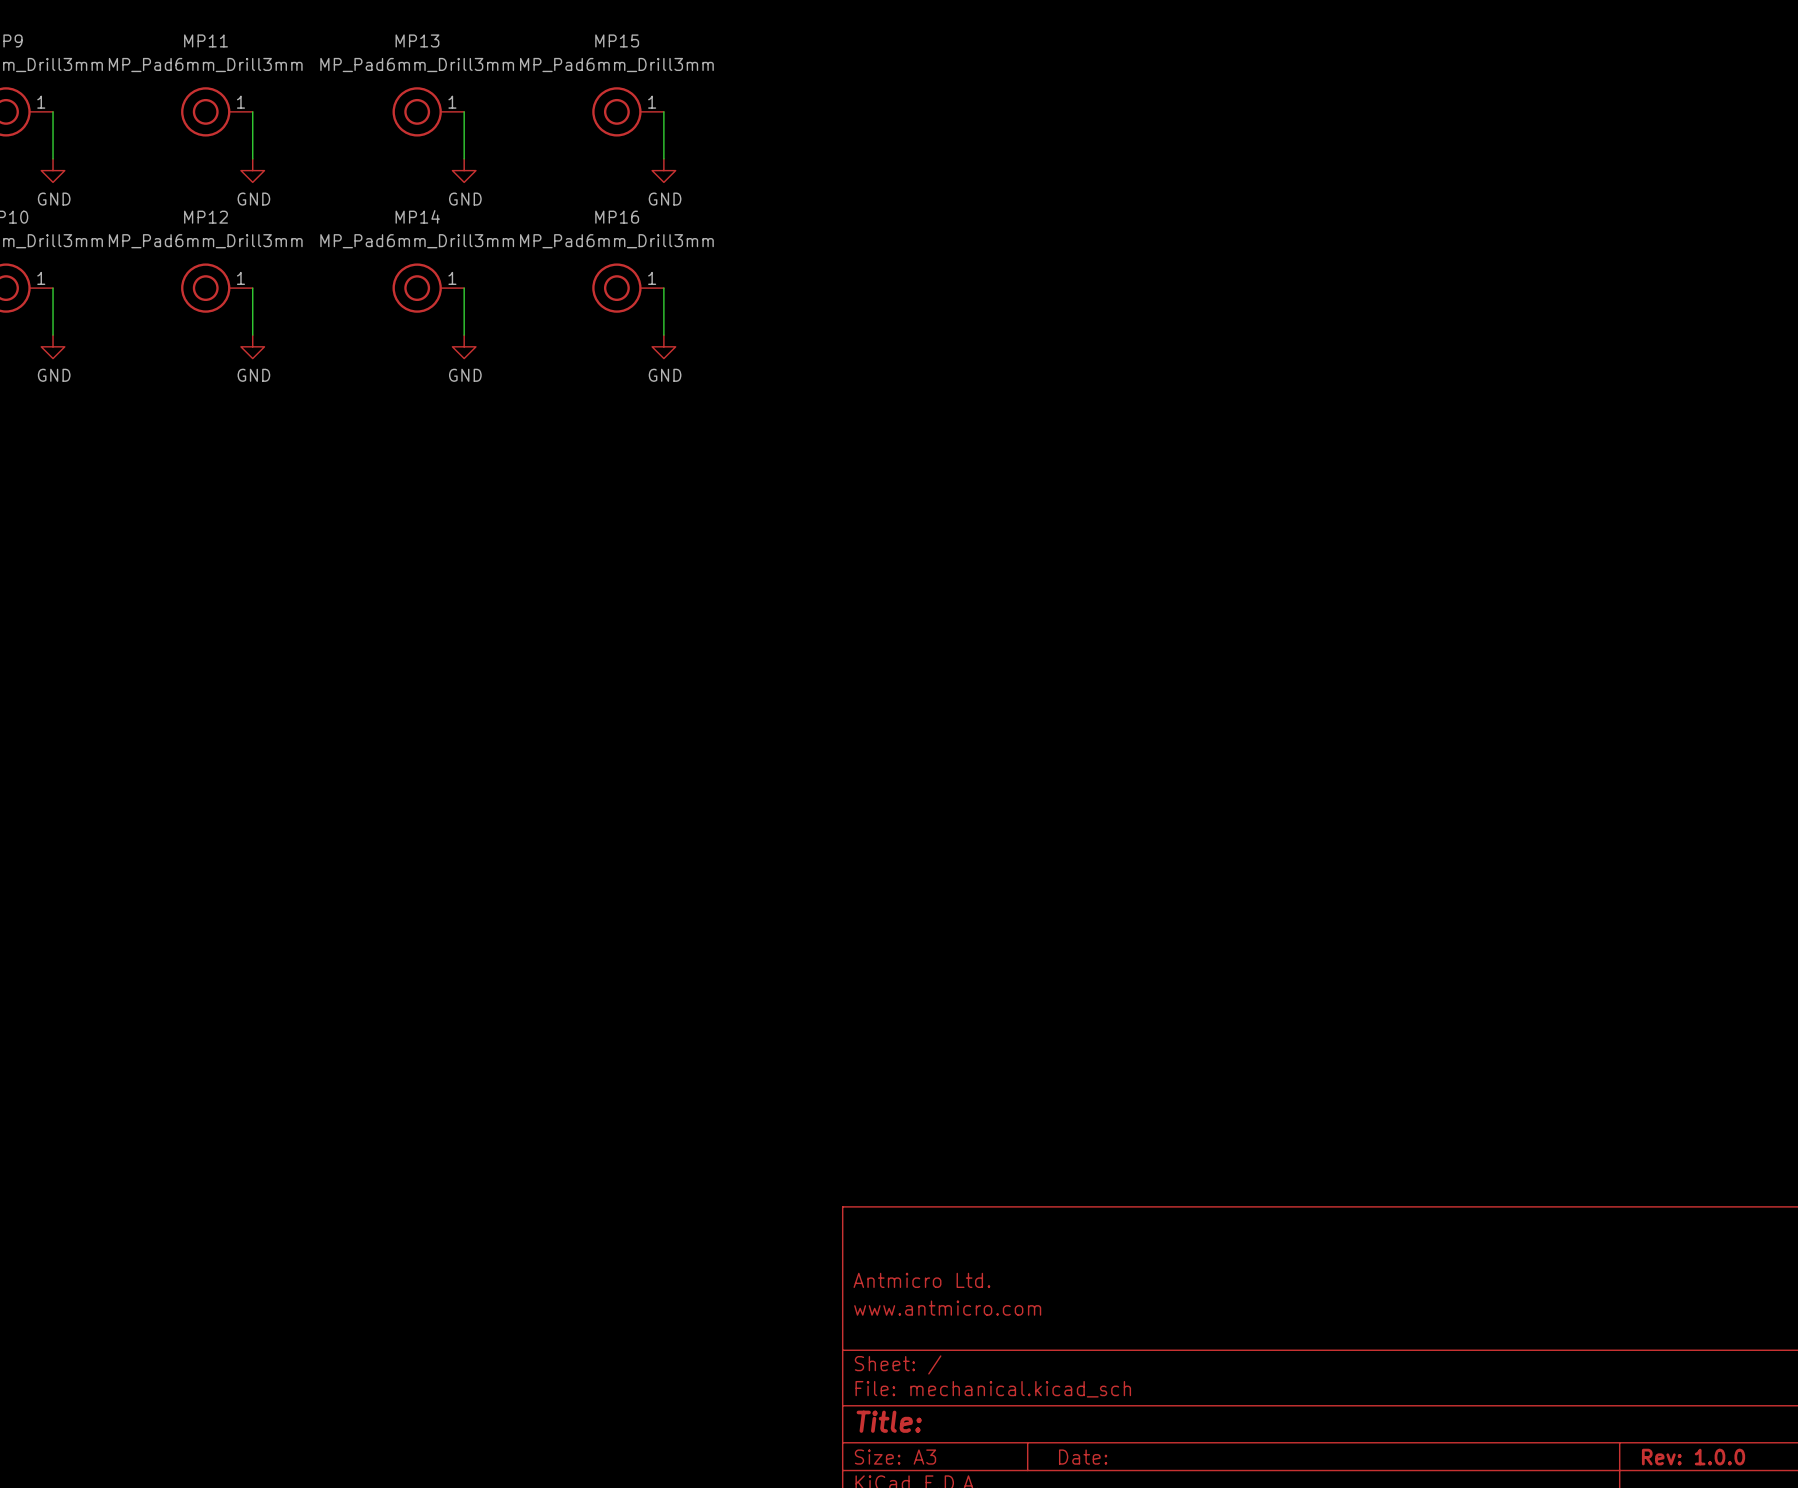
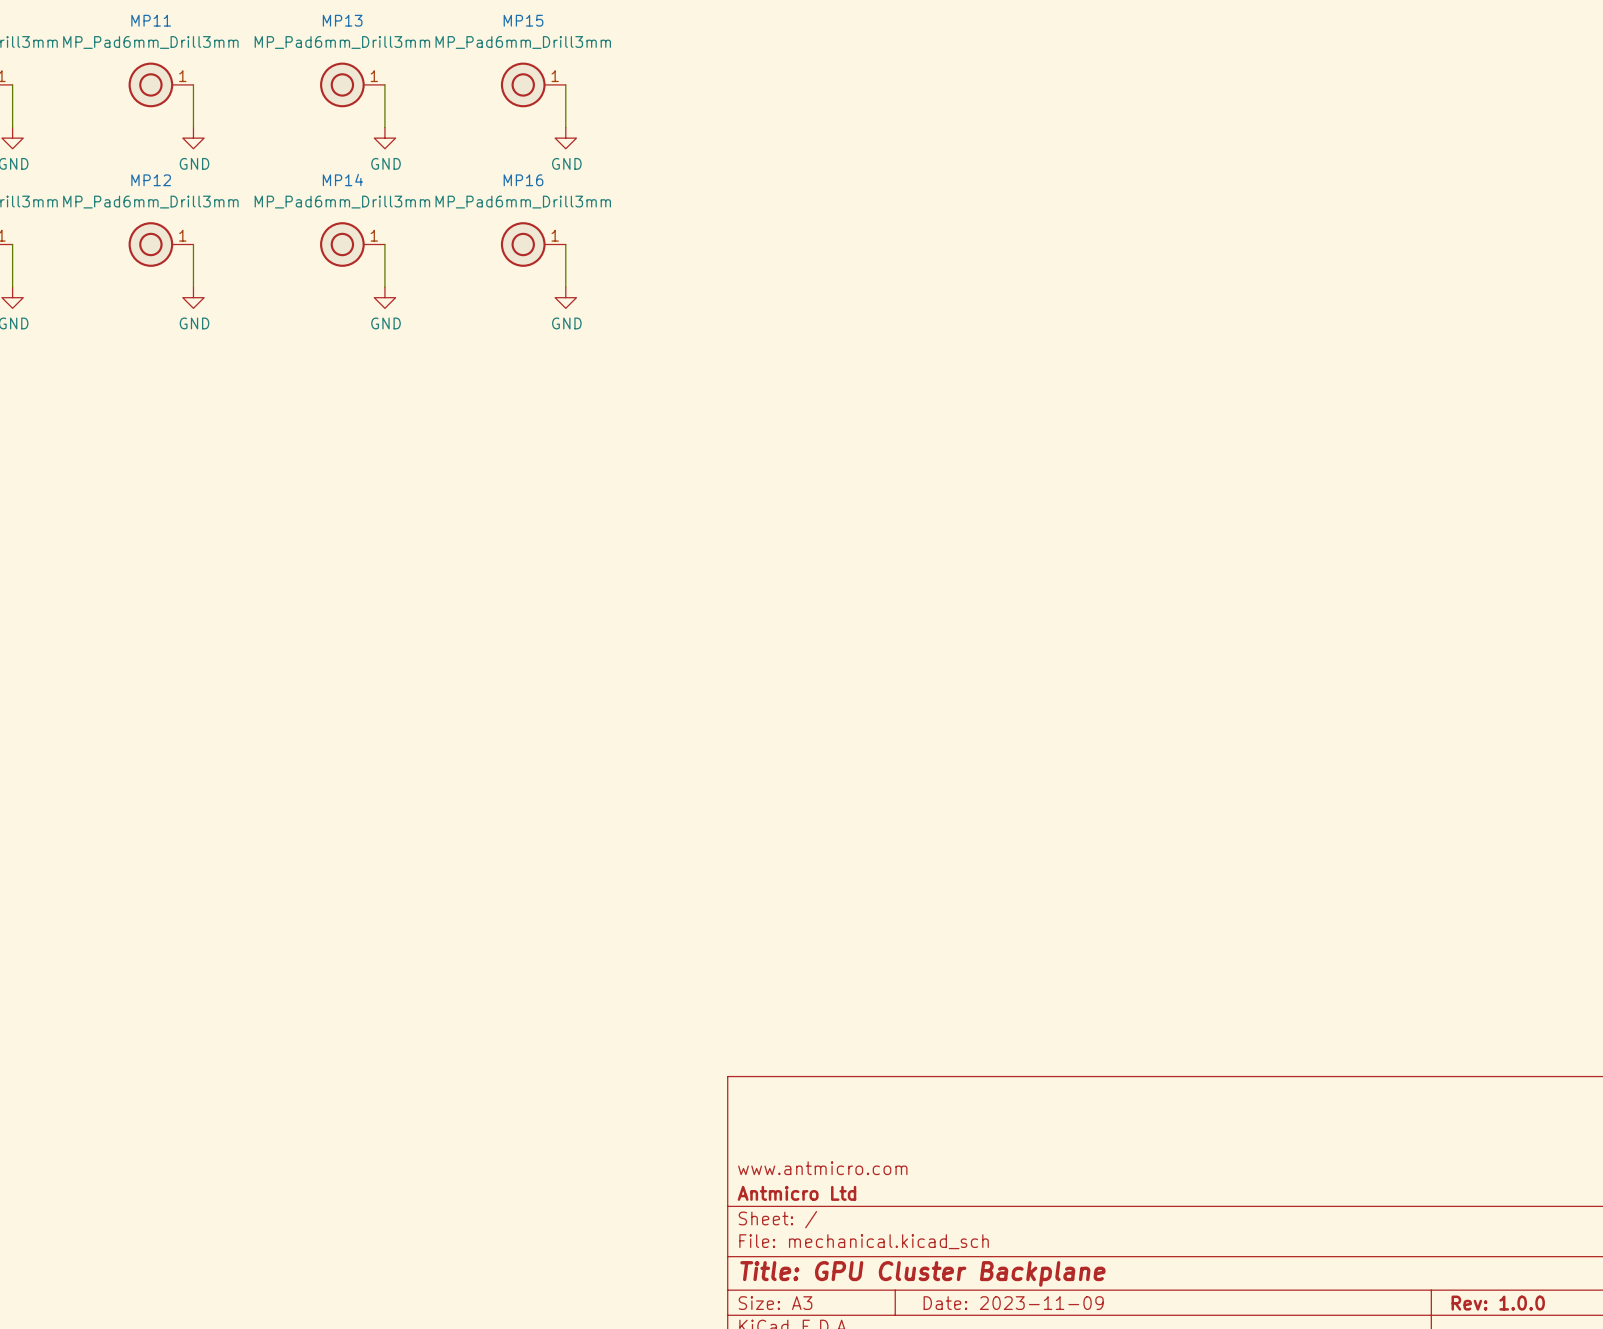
title block: Antmicro Ltd. (921, 1280) -> none
title block: none -> Antmicro Ltd (796, 1193)
title block: Title: (889, 1421) -> Title: GPU Cluster Backplane (922, 1273)
title block: Date: (1083, 1457) -> Date: 2023-11-09 (1013, 1303)

